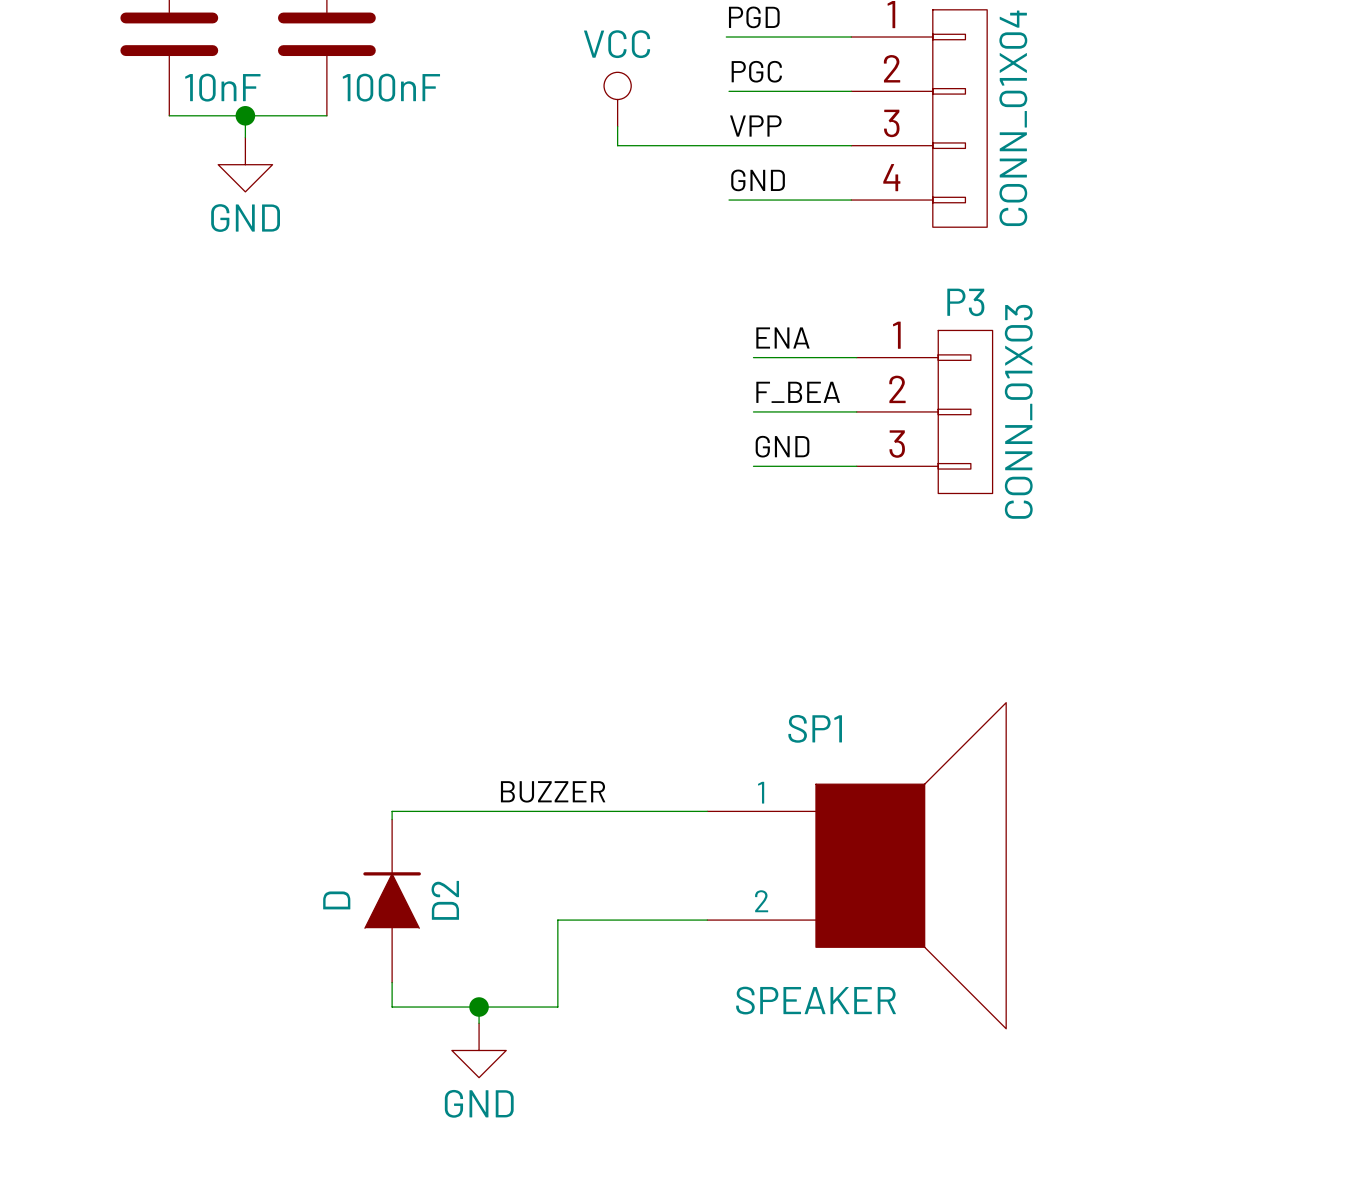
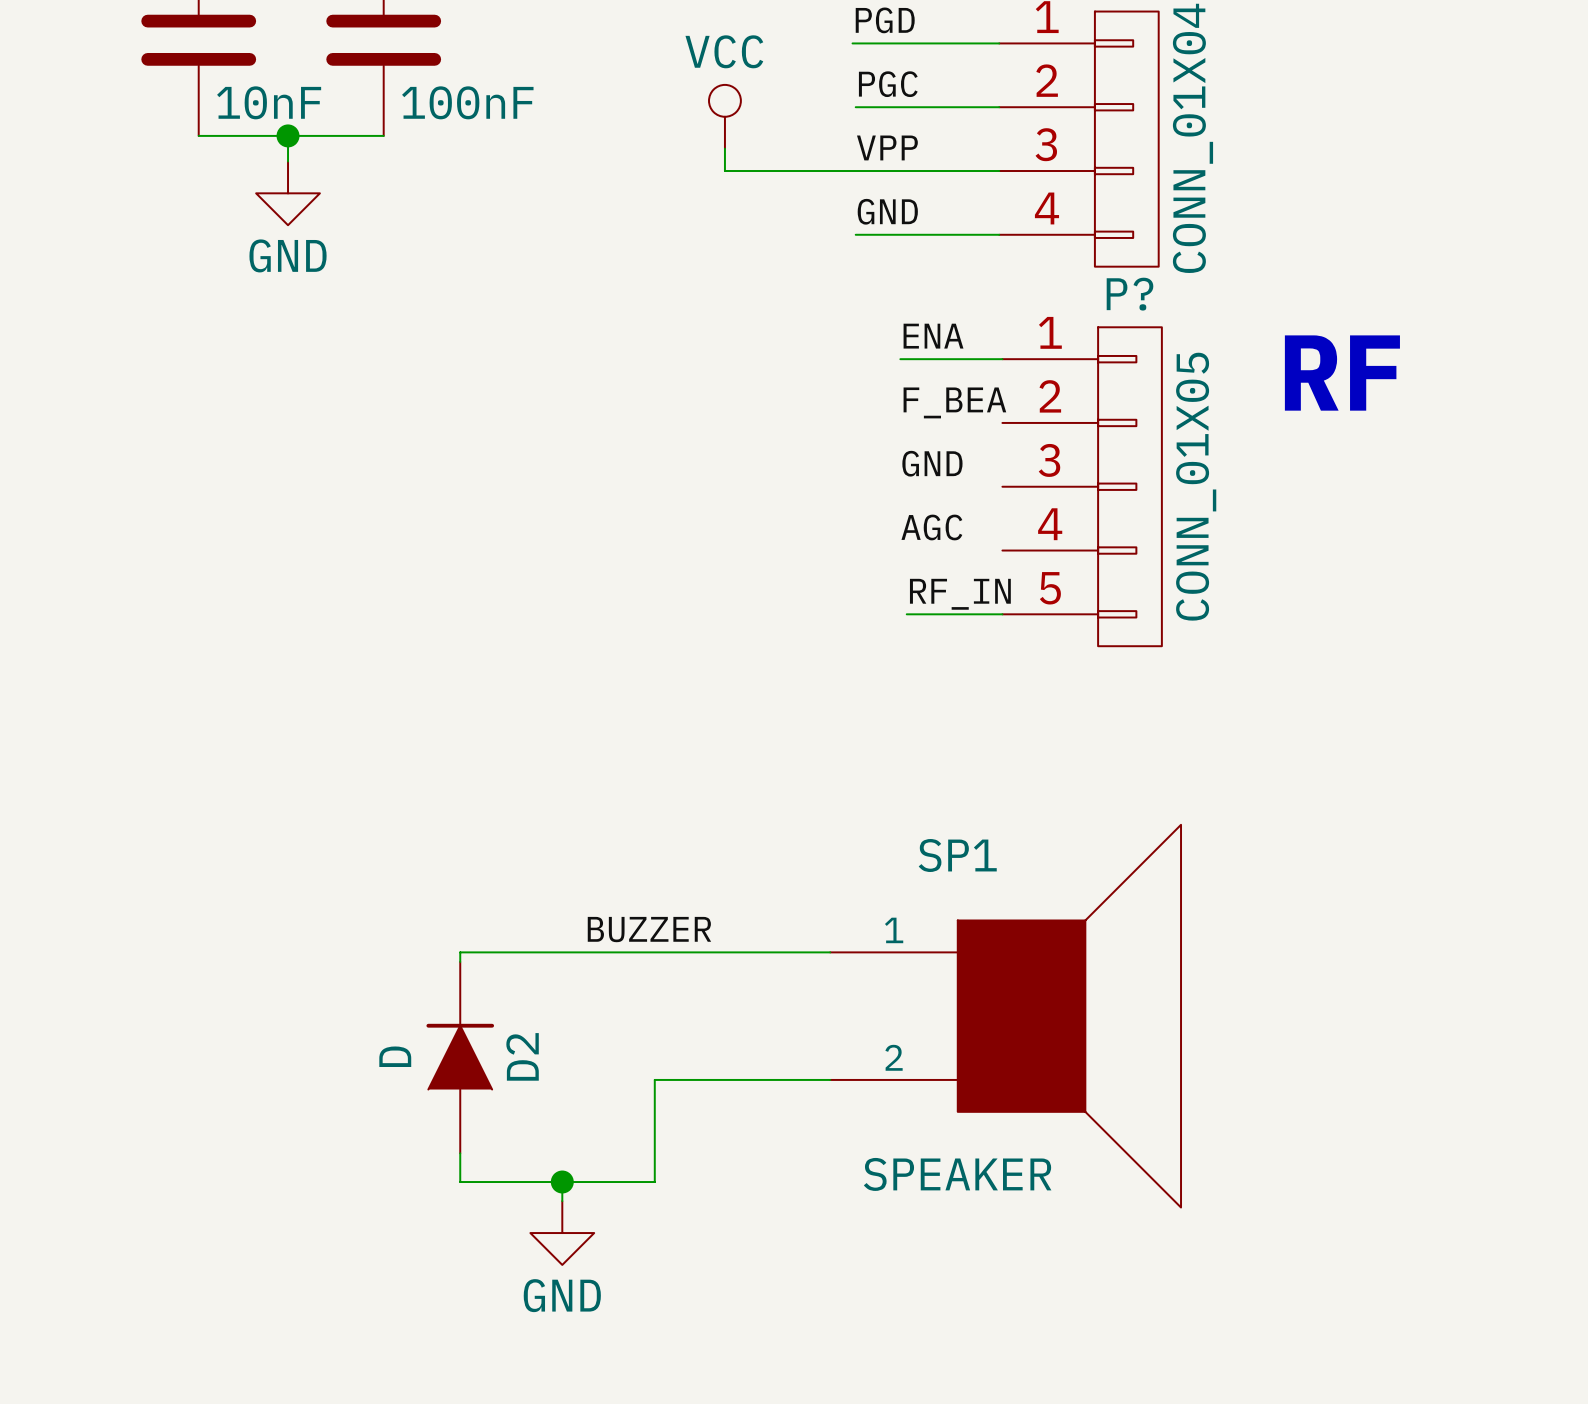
wire: none -> (900, 359) (1002, 359)
text: none -> RF (1342, 373)
label position: ENA (782, 337) -> ENA (933, 336)
wire: (753, 357) (856, 357) -> none
label position: F_BEA (798, 392) -> F_BEA (954, 402)
wire: (753, 411) (856, 411) -> none
P3: CONN_01X03 (924, 411) -> none
P?: none -> CONN_01X05 (1082, 486)
label position: GND (782, 446) -> GND (932, 463)
label: none -> AGC (931, 527)
wire: (753, 466) (856, 466) -> none
label: none -> RF_IN (960, 594)
wire: none -> (906, 614) (1002, 614)

